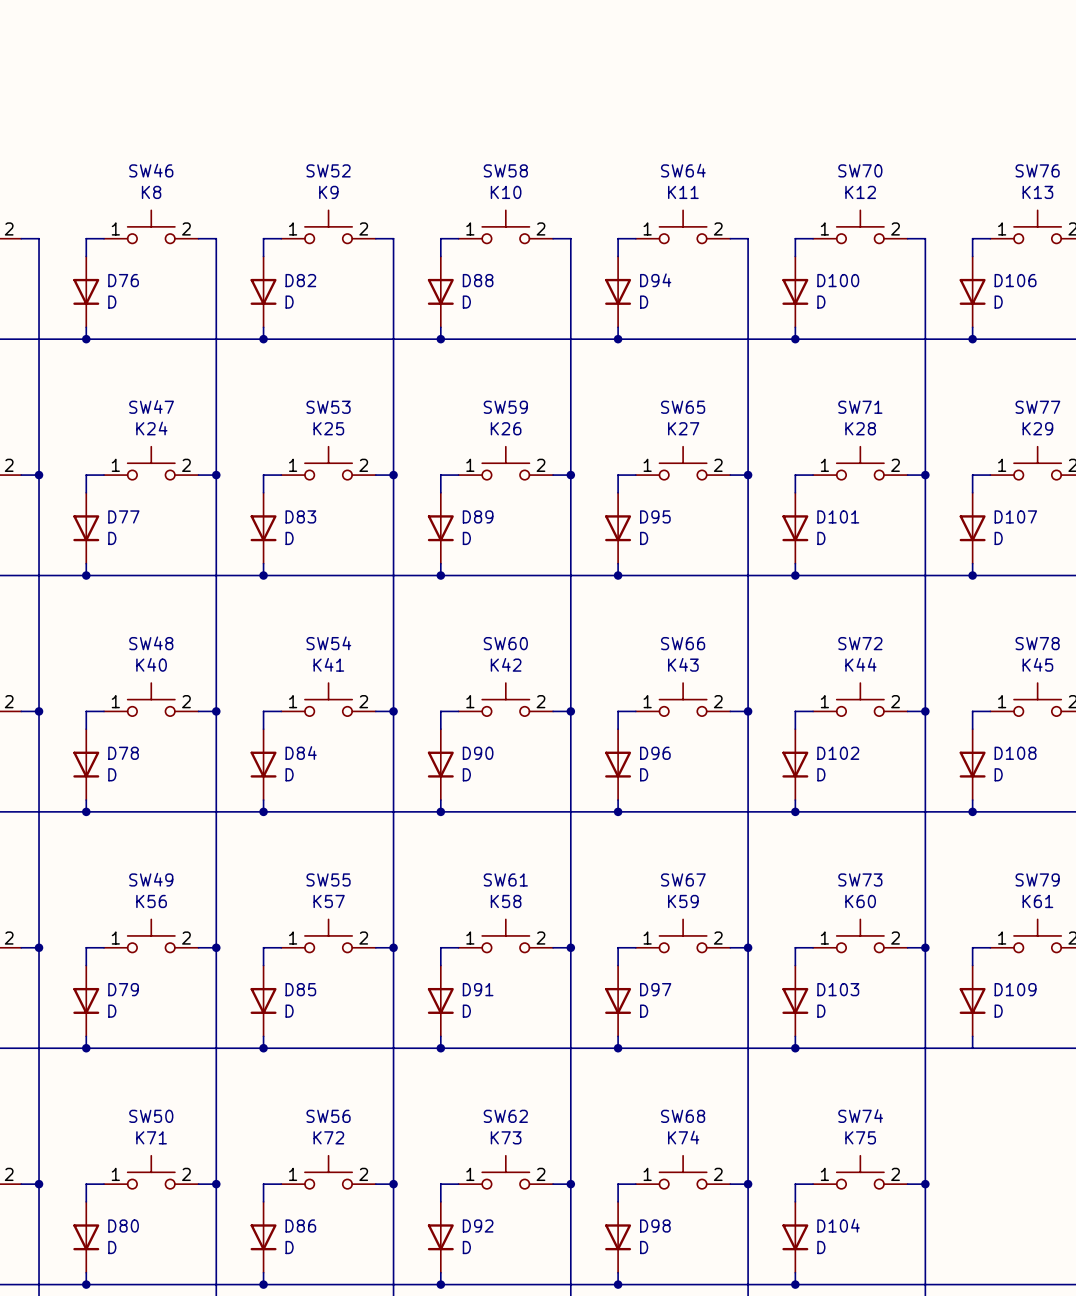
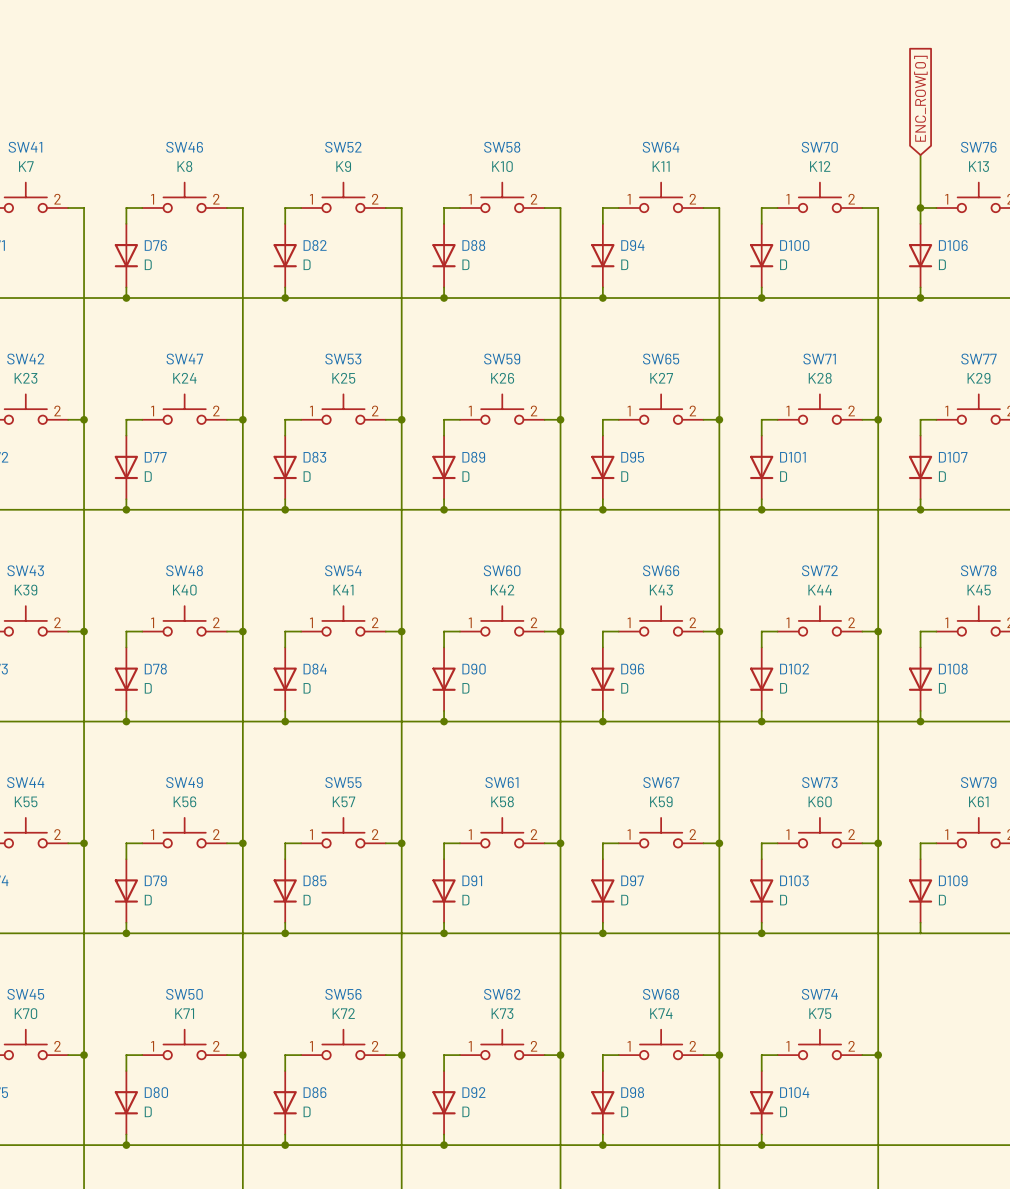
global label: none -> ENC_ROW[0] (920, 98)
wire: none -> (920, 155) (920, 208)
junction: none -> (920, 208)

